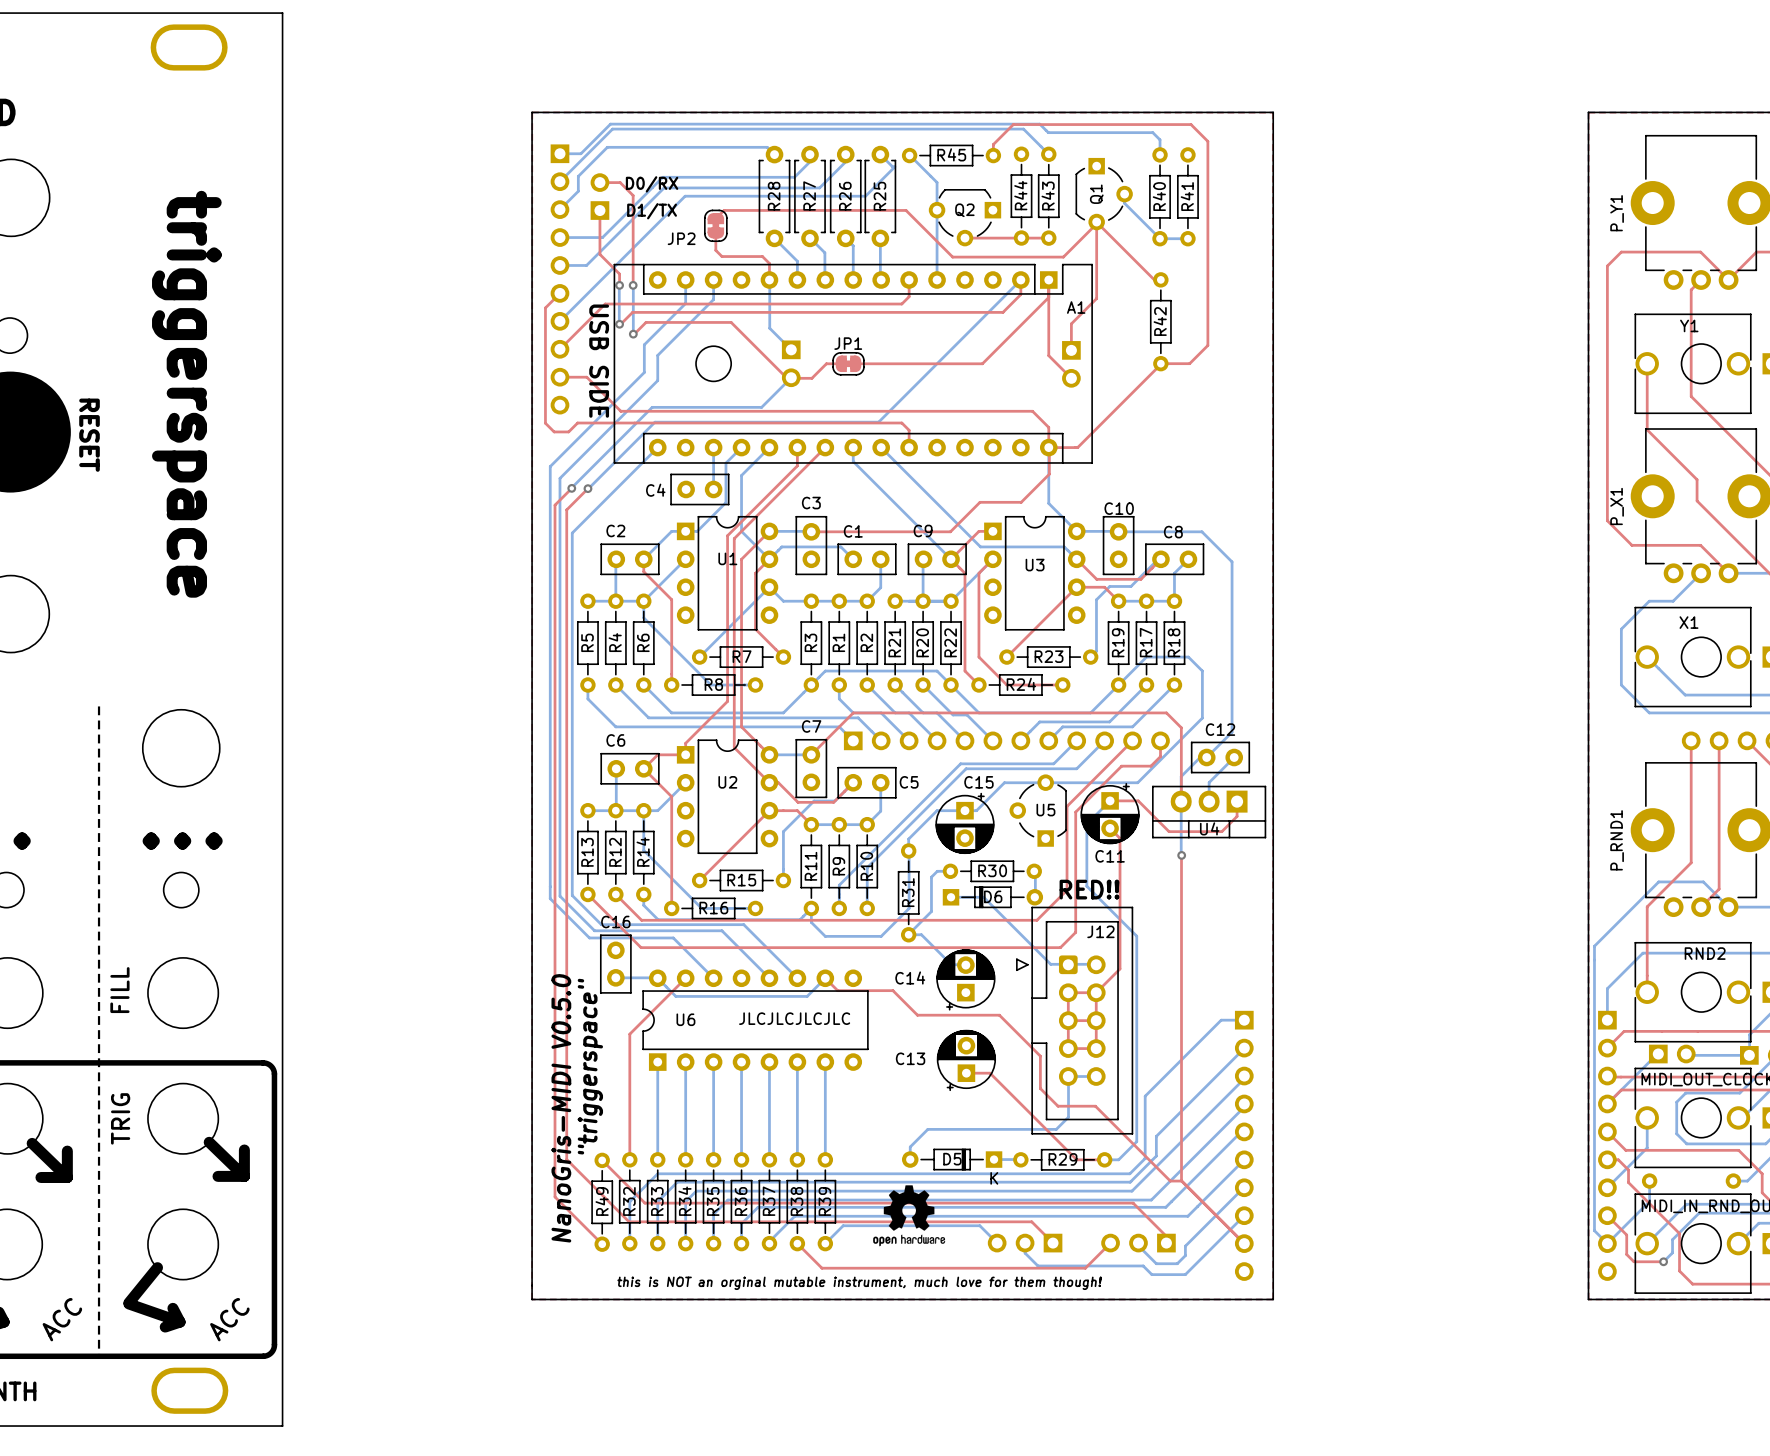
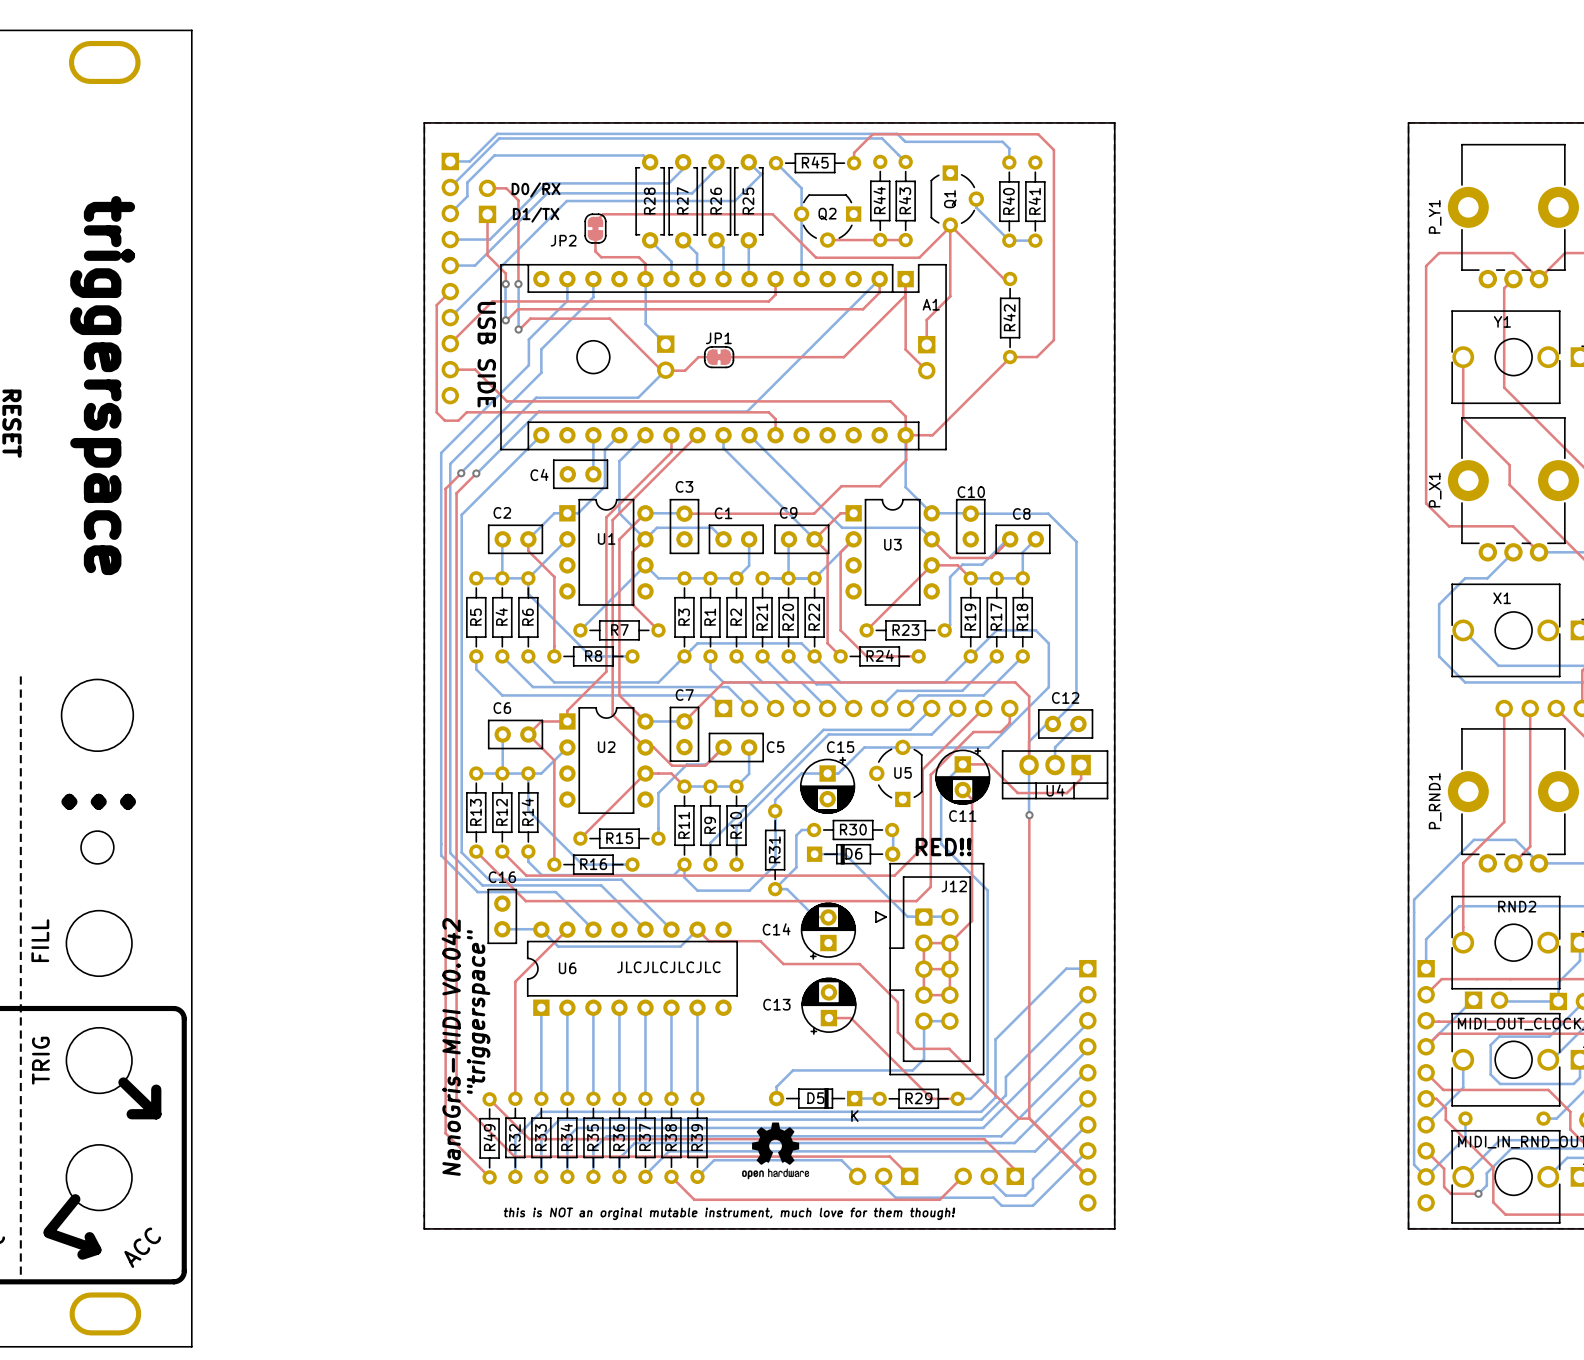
text: NanoGris-MIDI V0.5.0 (561, 1108) -> NanoGris-MIDI V0.042 (451, 1046)

